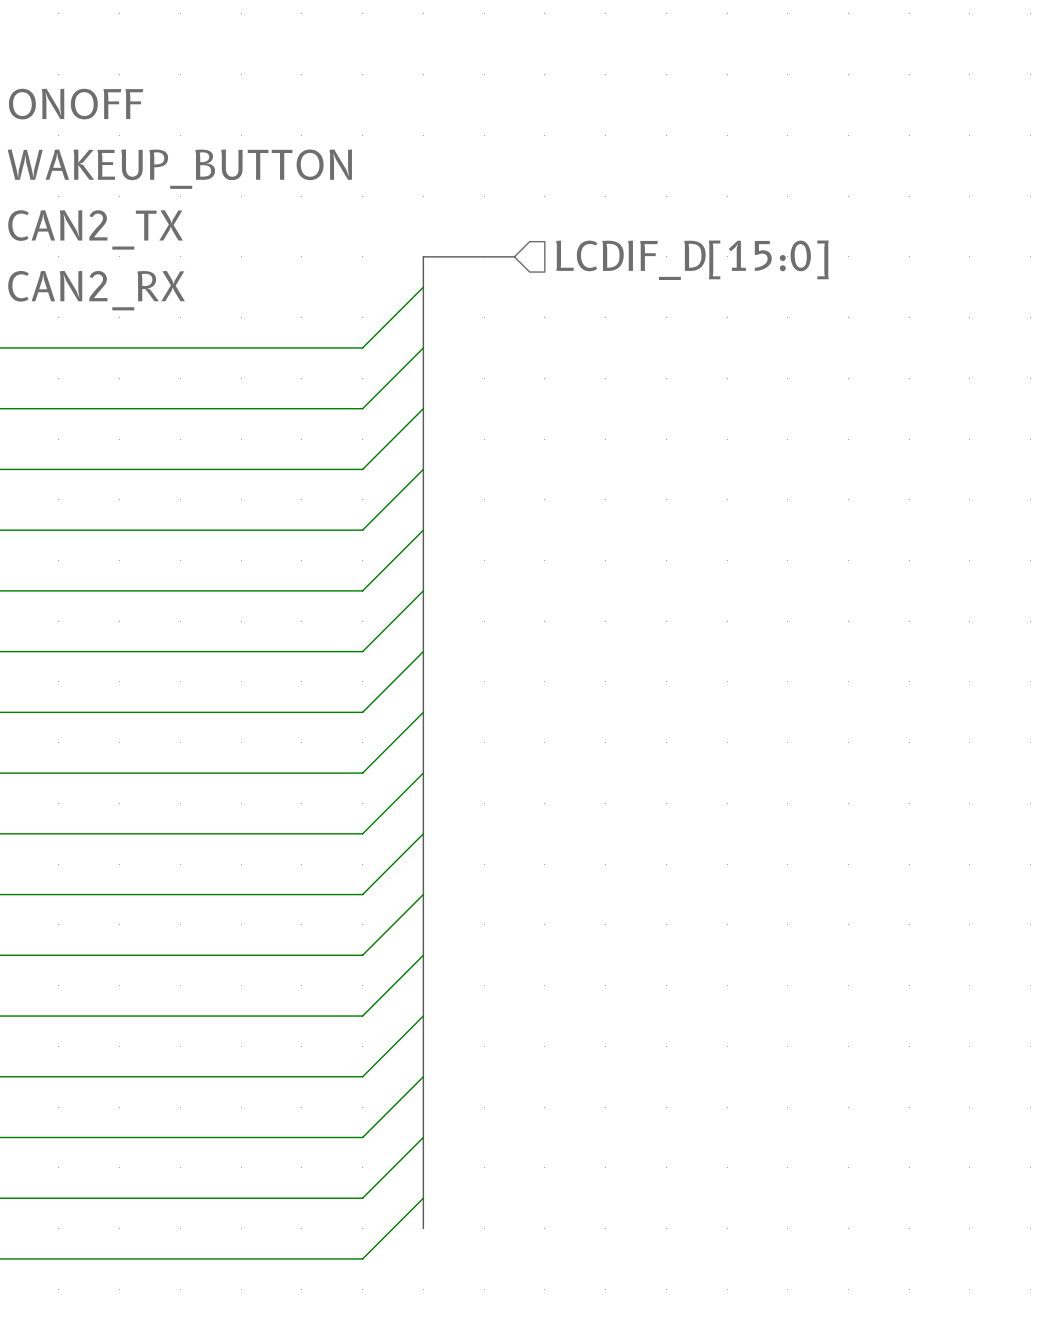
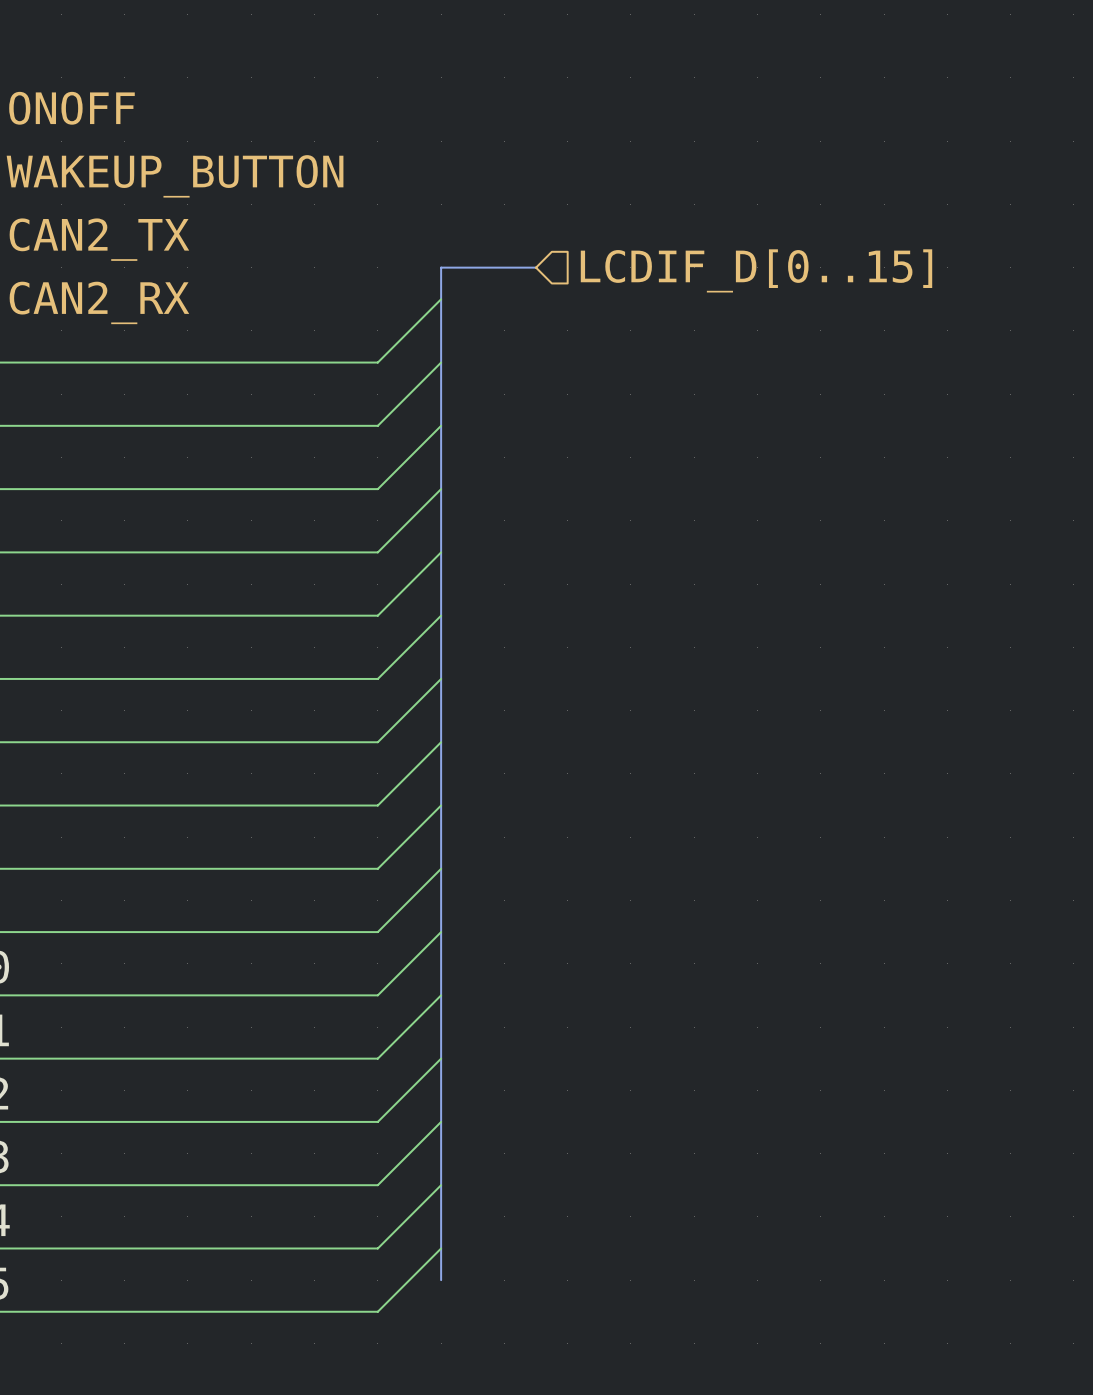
hierarchical label: LCDIF_D[15:0] (692, 260) -> LCDIF_D[0..15] (756, 270)

